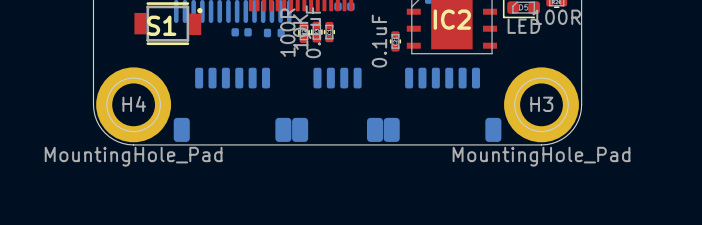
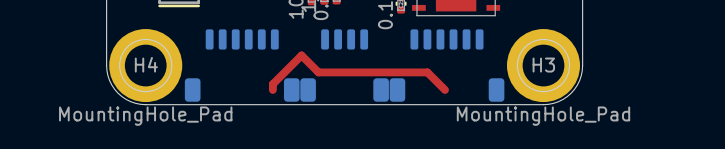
top track: none -> (272, 89) (272, 84) (301, 55) (318, 72) (427, 72) (445, 89)

